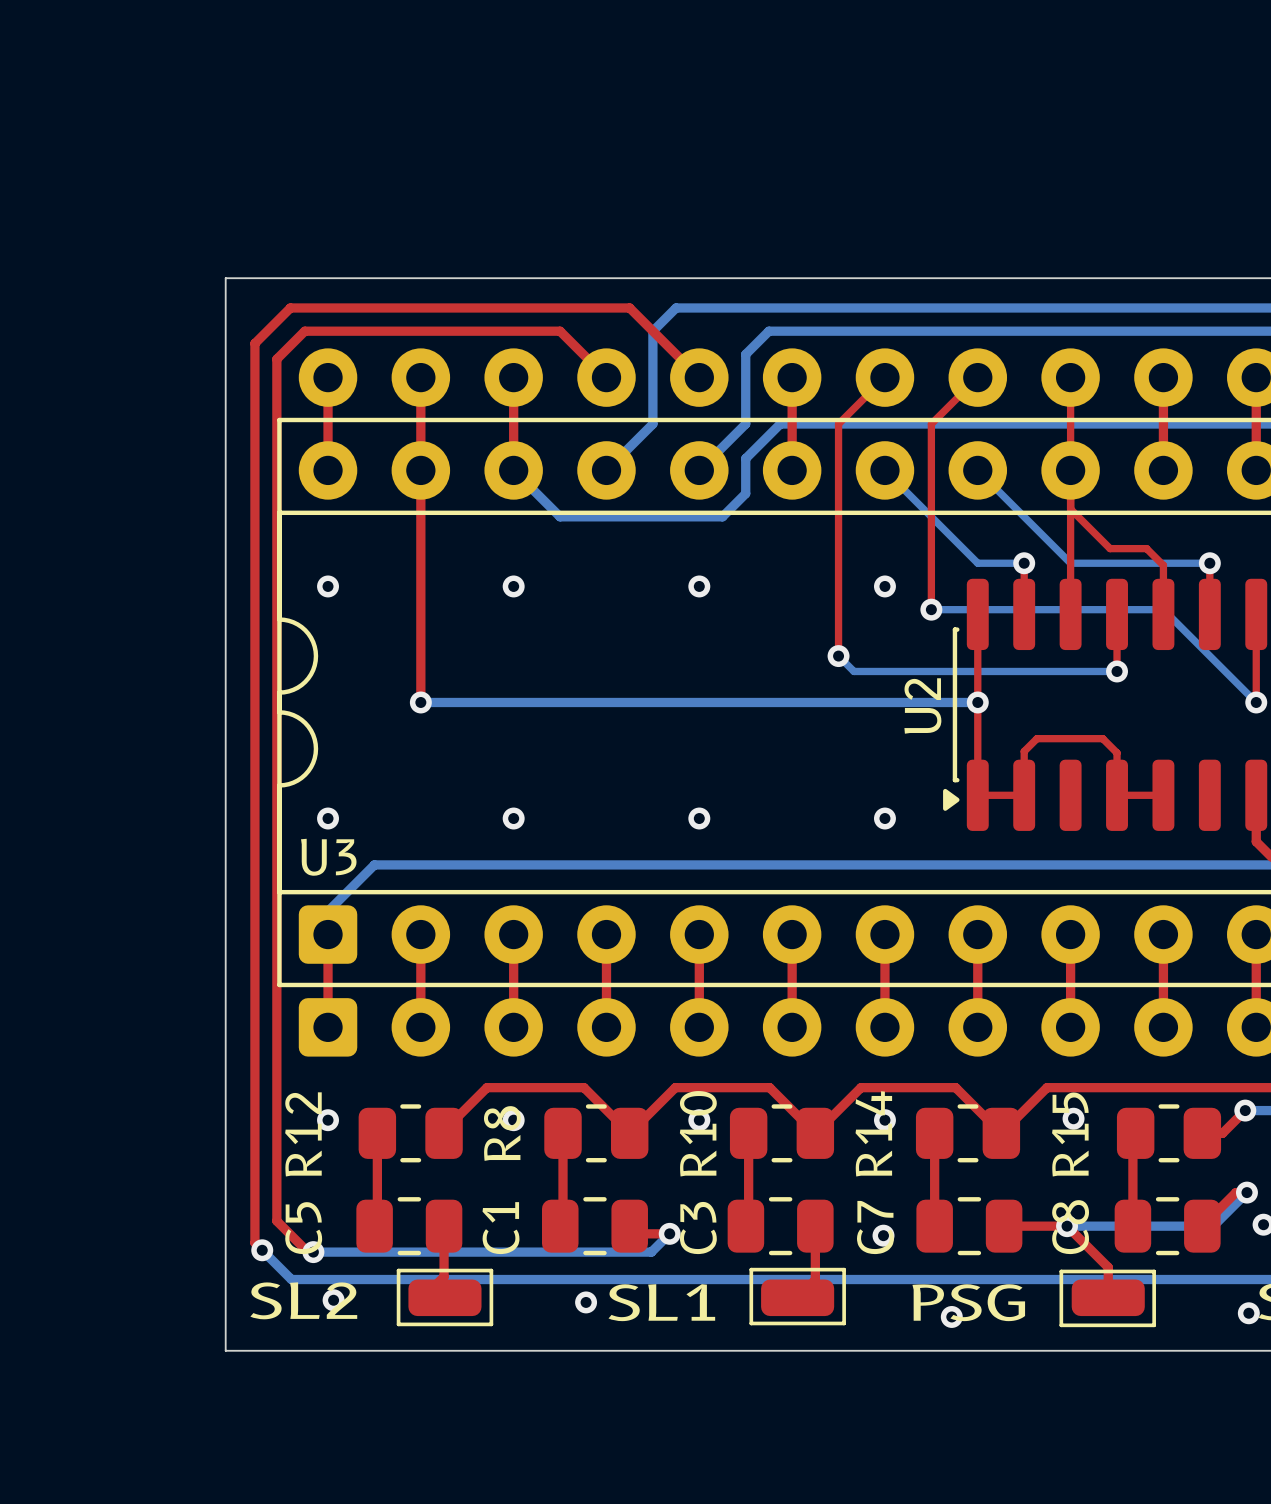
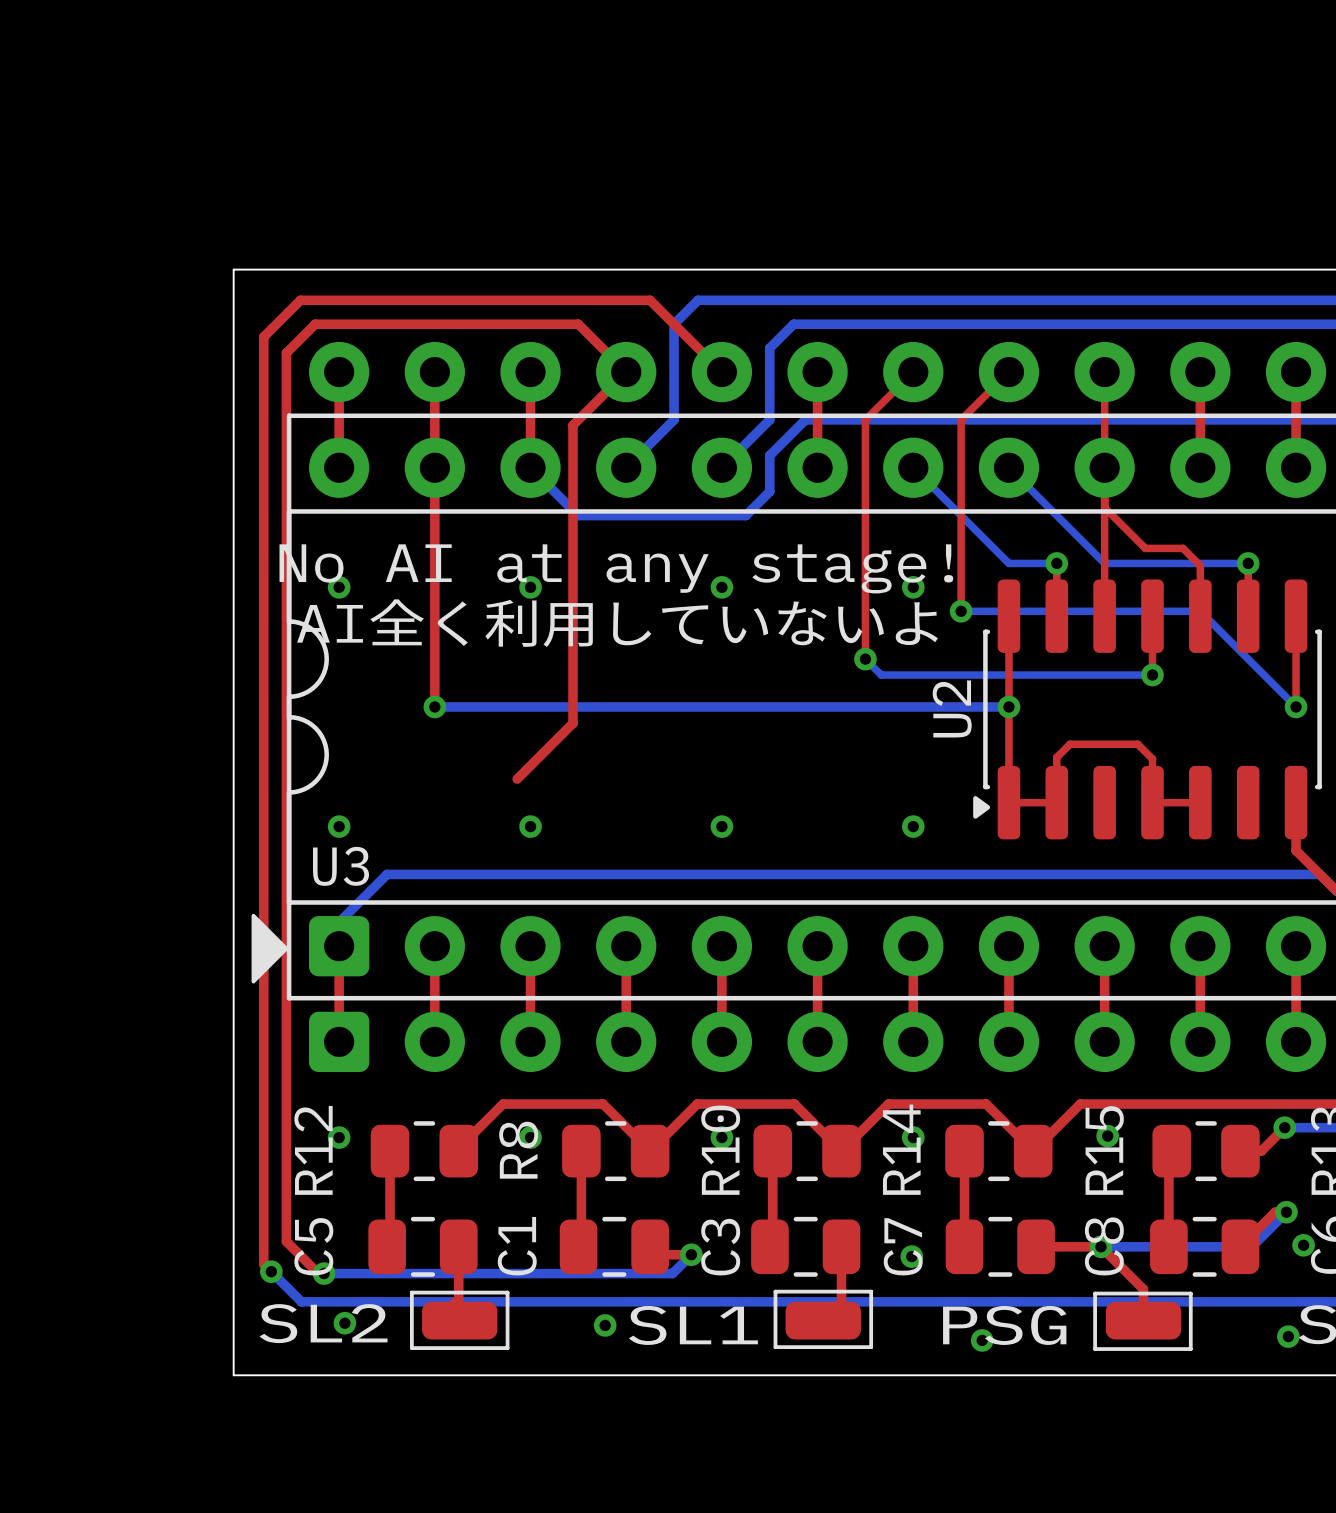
top track: none -> (626, 372) (572, 425) (572, 723) (517, 779)
text: none -> No AI at any stage! (616, 568)
text: none -> AI全く利用していないよ (617, 623)
drawing: none -> [251, 913, 289, 984]

